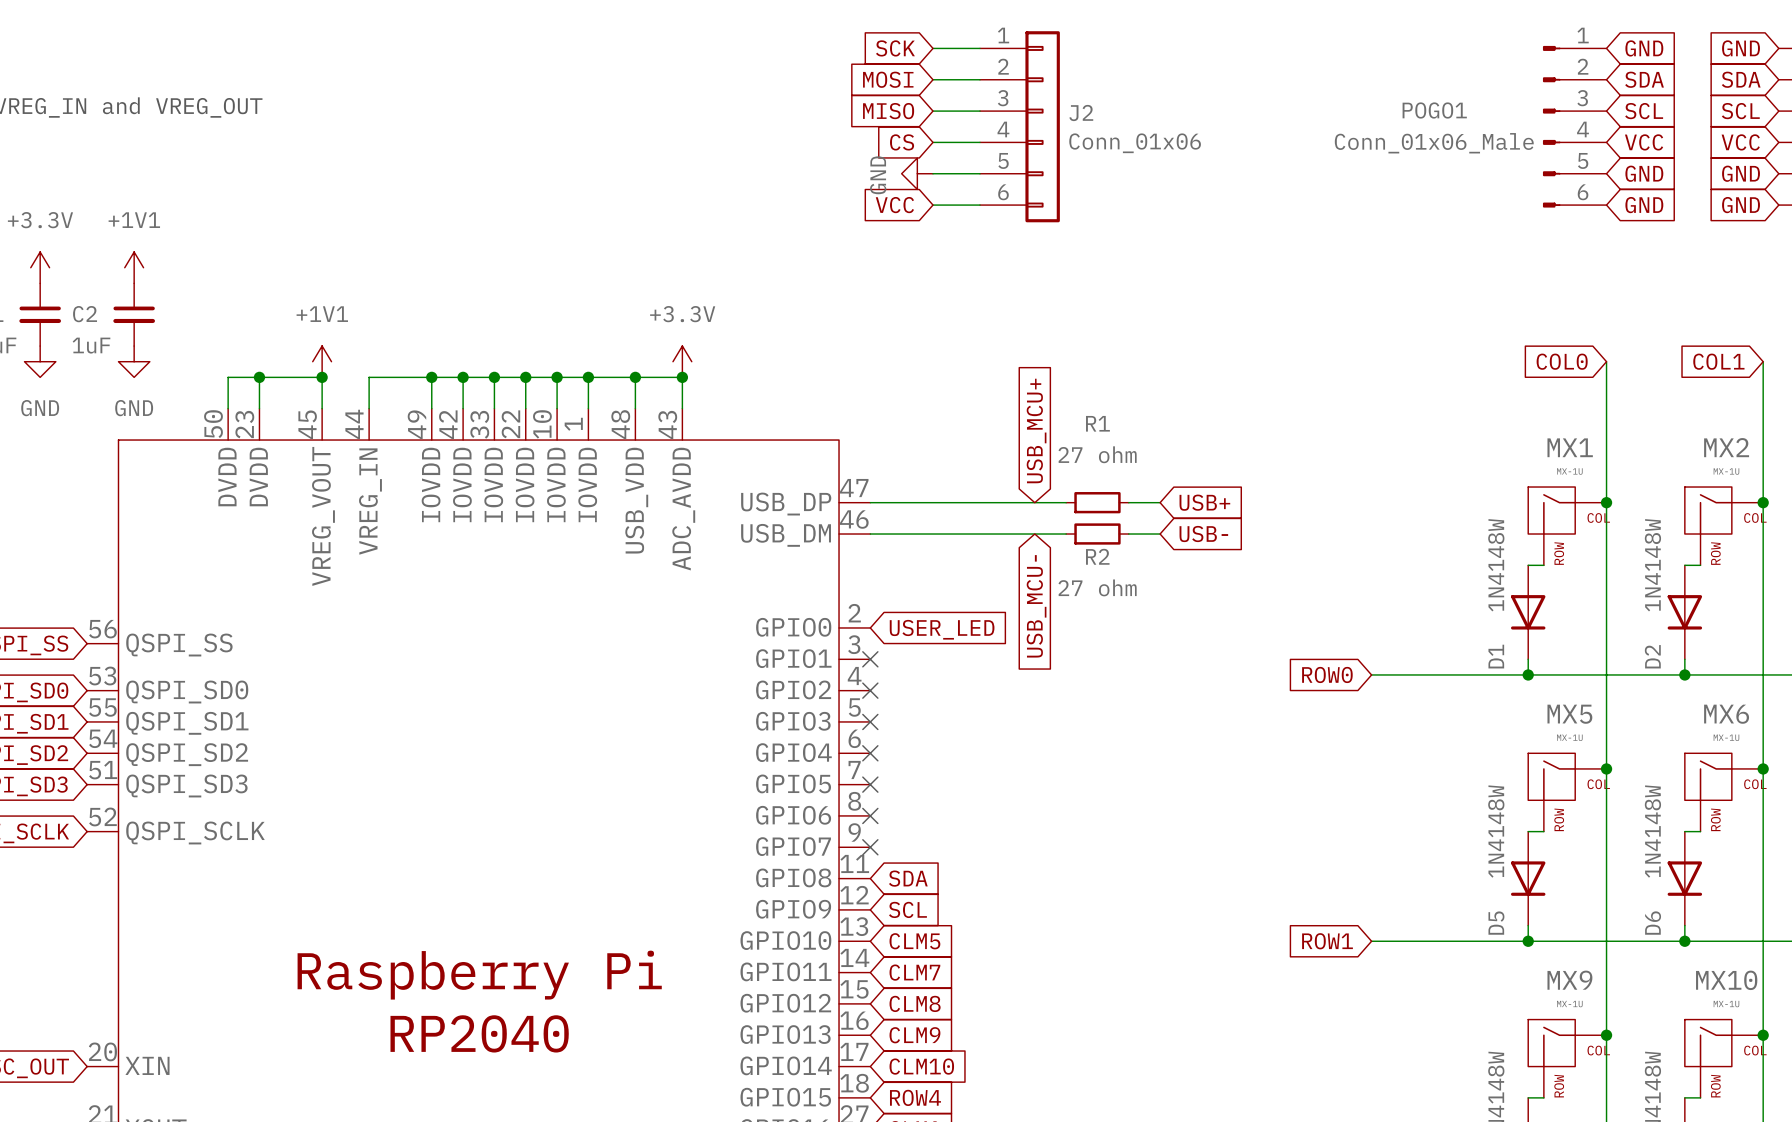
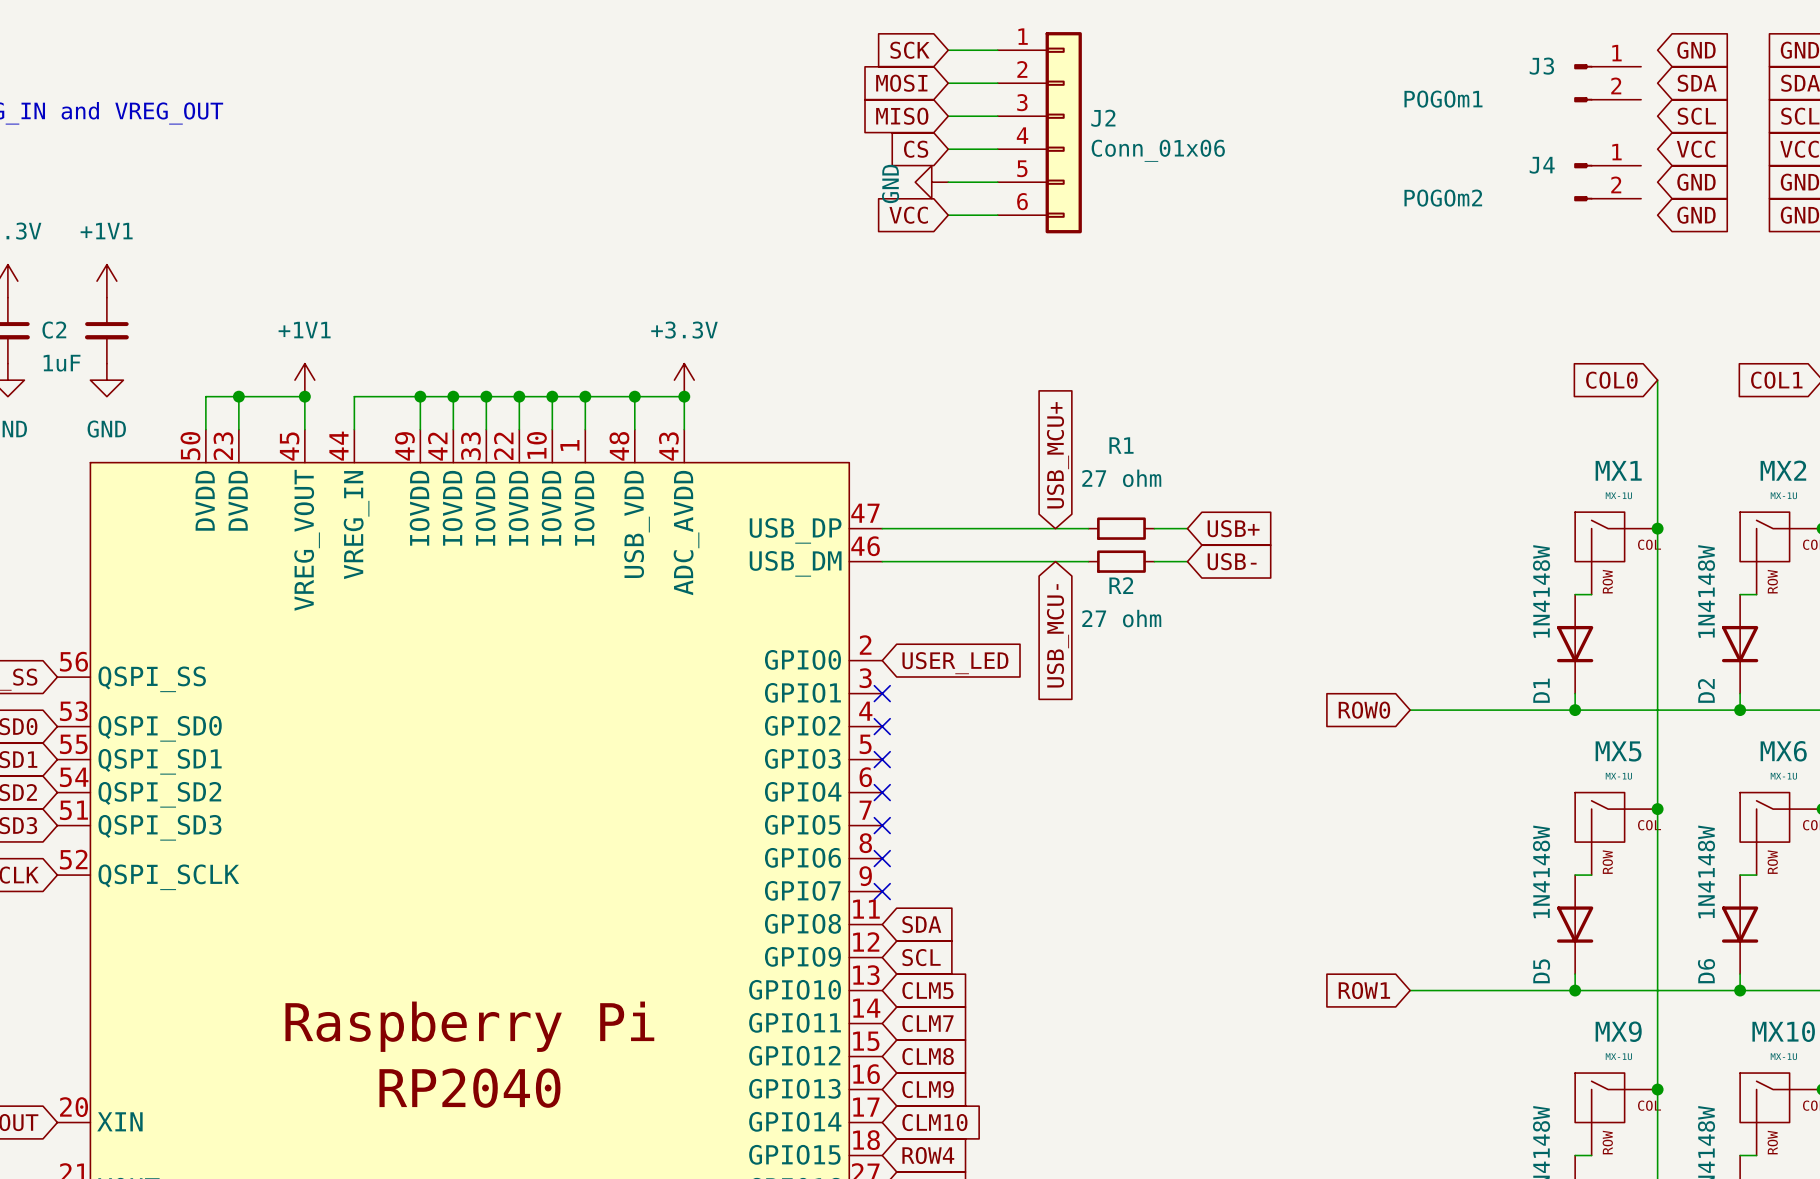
J3: none -> POGOm1 (1607, 83)
POGO1: Conn_01x06_Male (1574, 126) -> none
J4: none -> POGOm2 (1607, 182)

